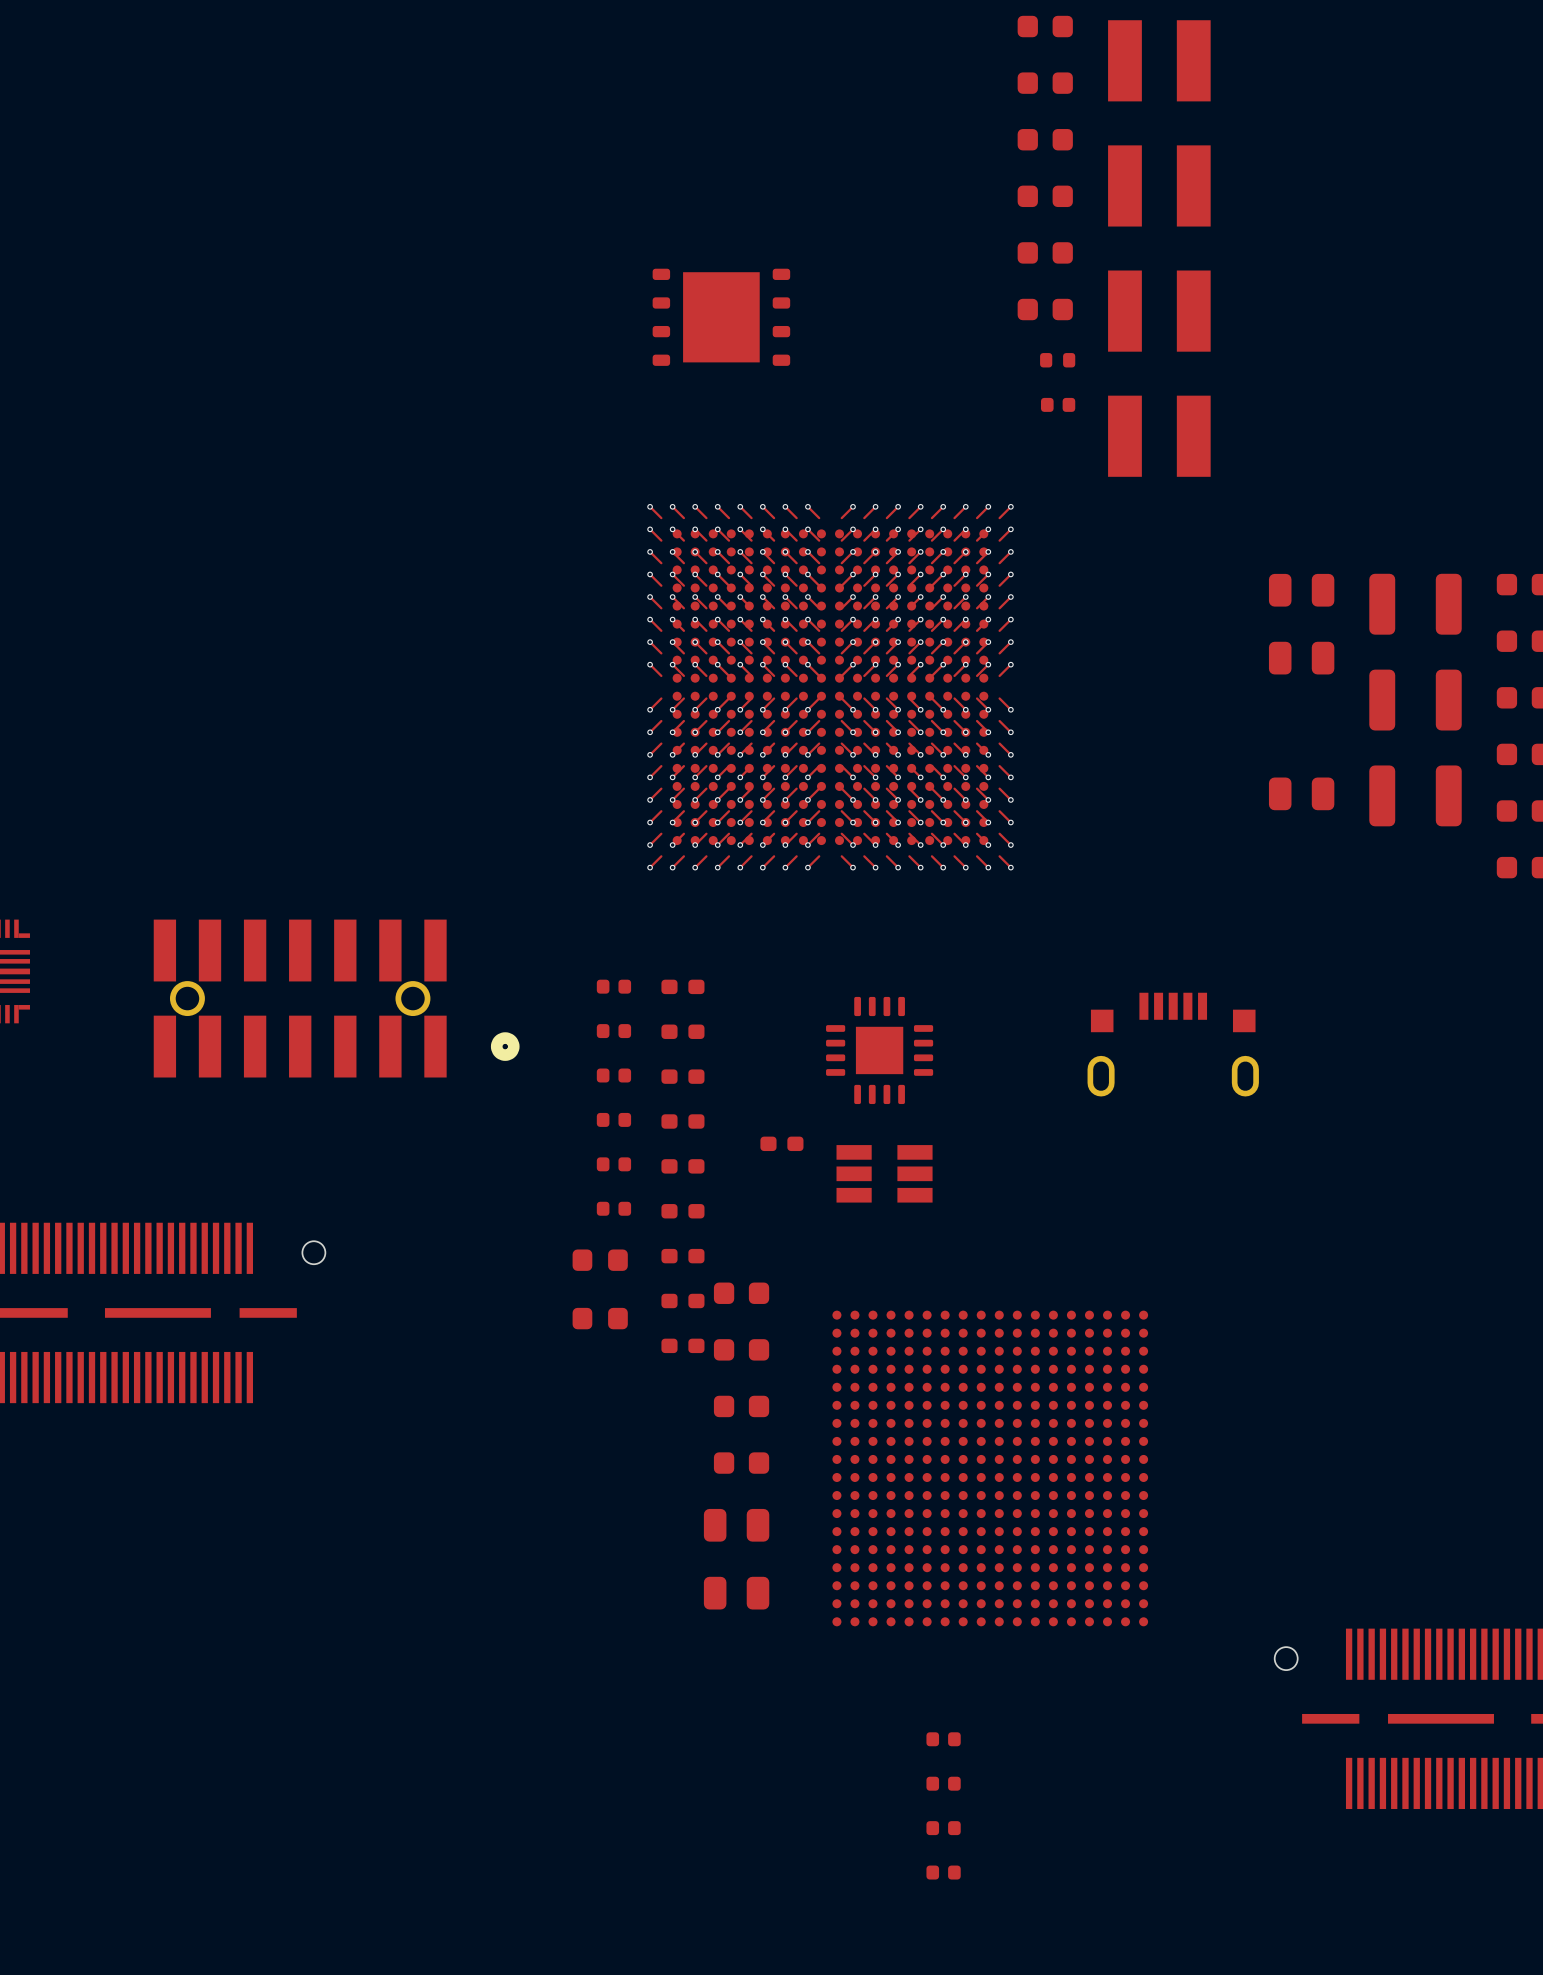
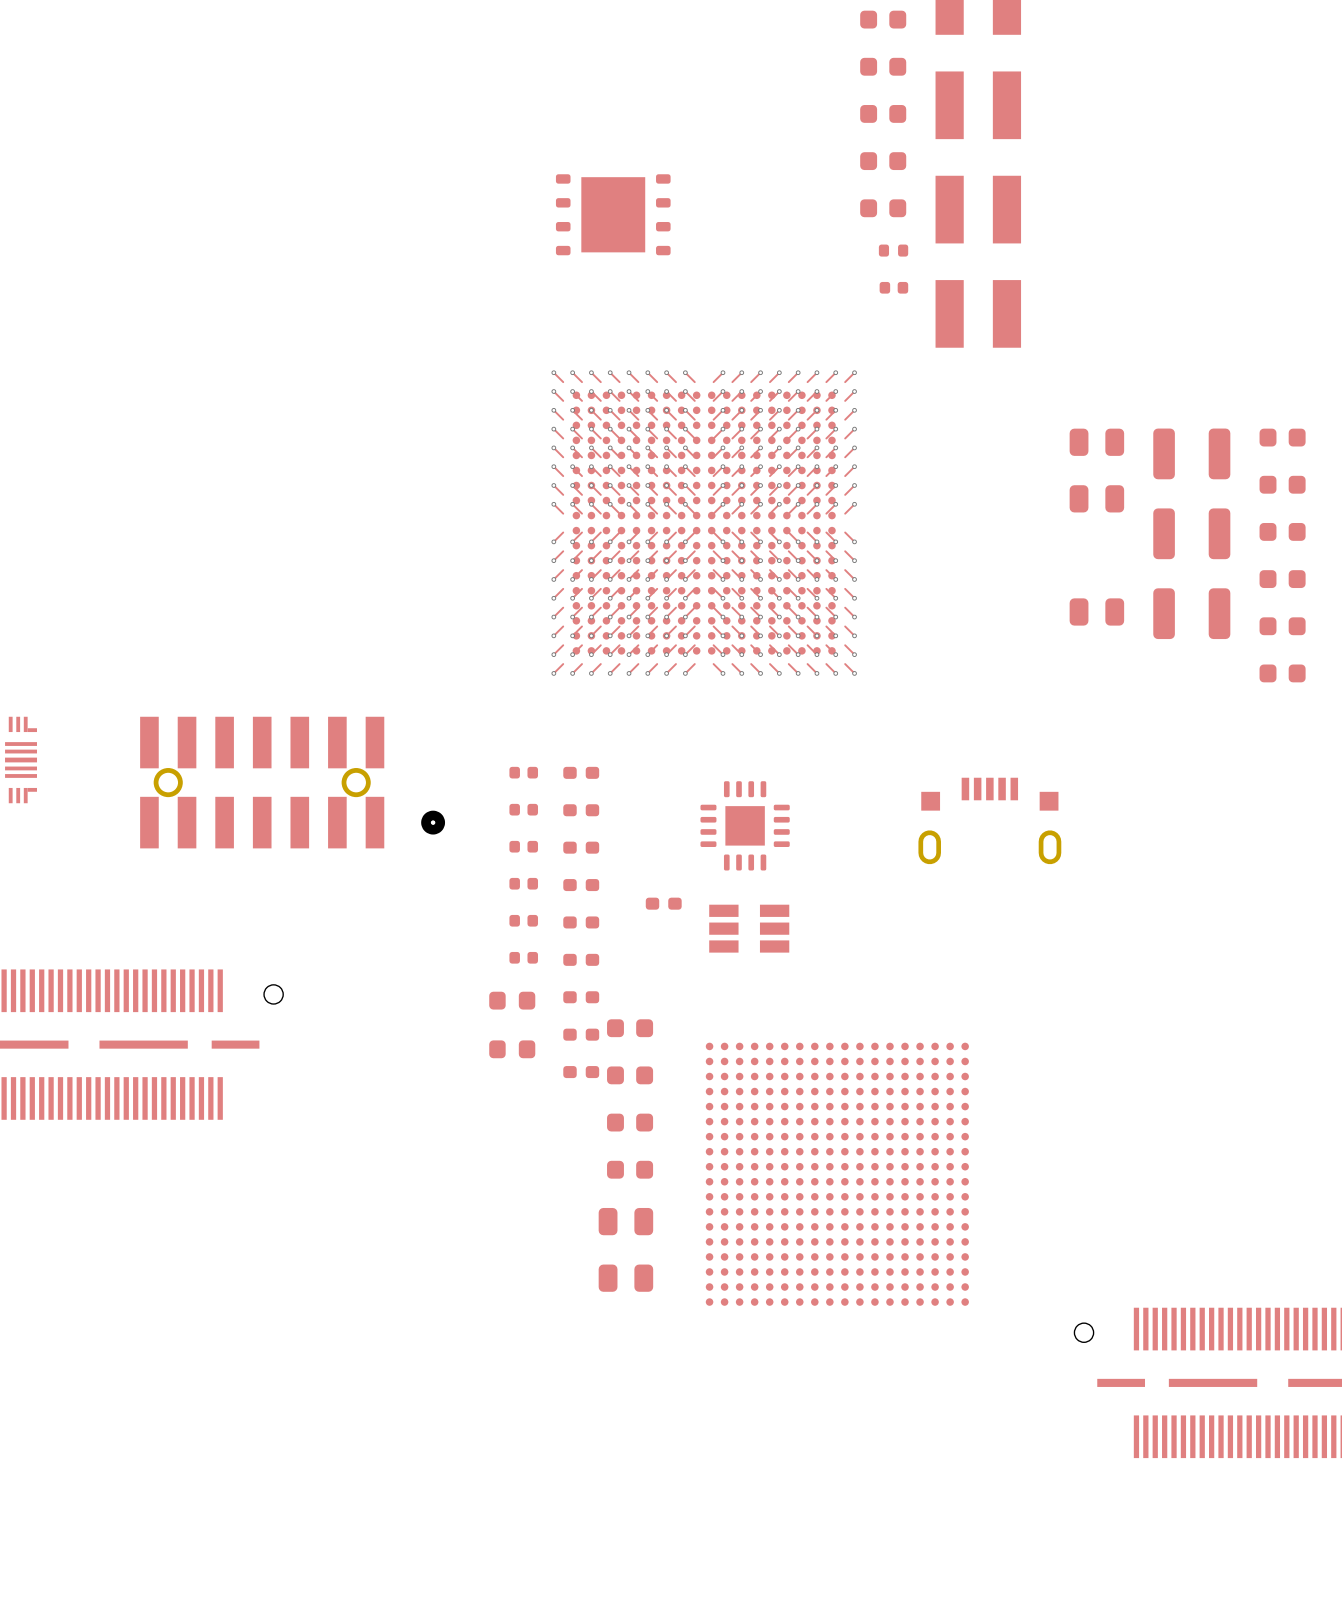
part: (943, 1739) -> none
part: (943, 1783) -> none
part: (943, 1828) -> none
part: (943, 1872) -> none

